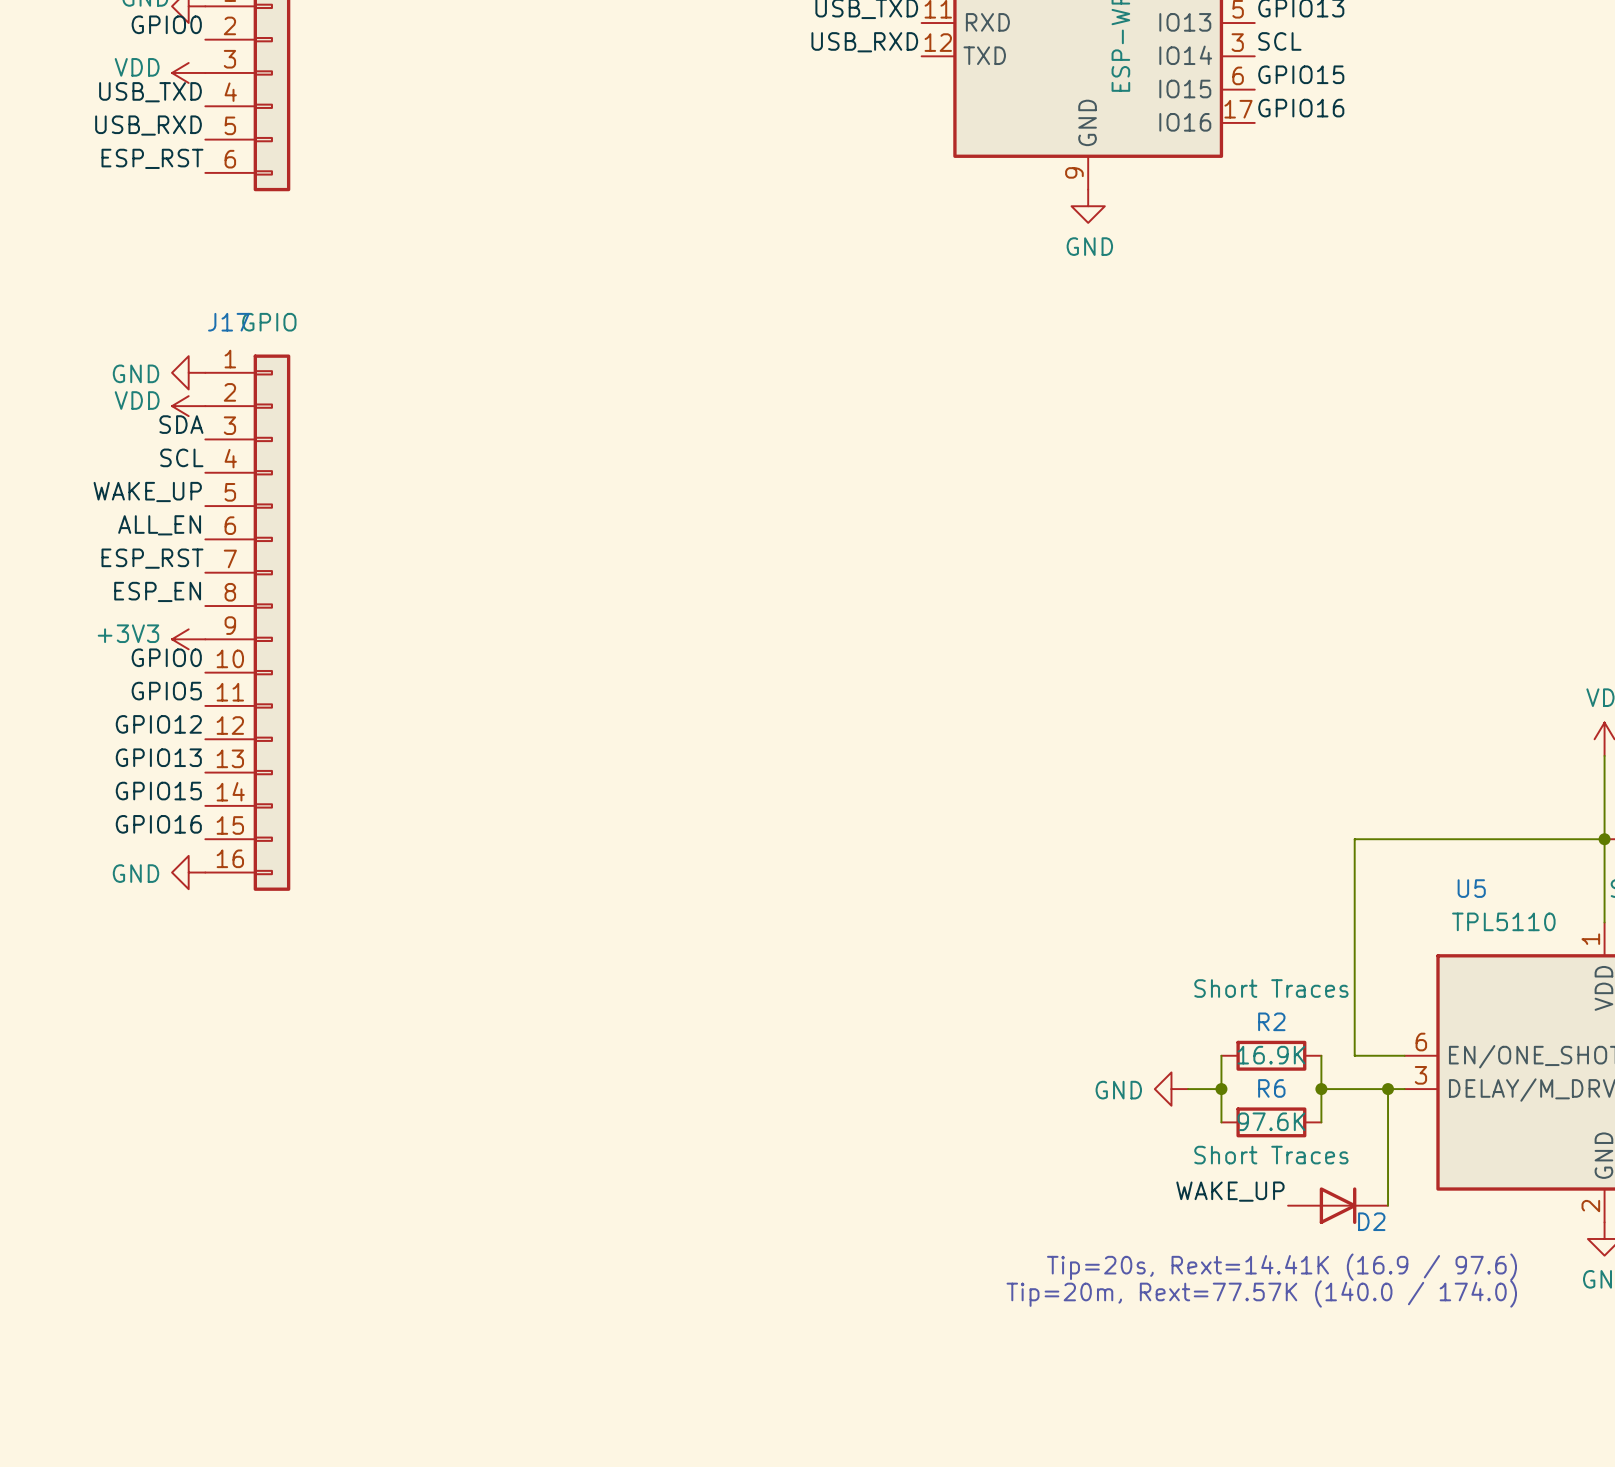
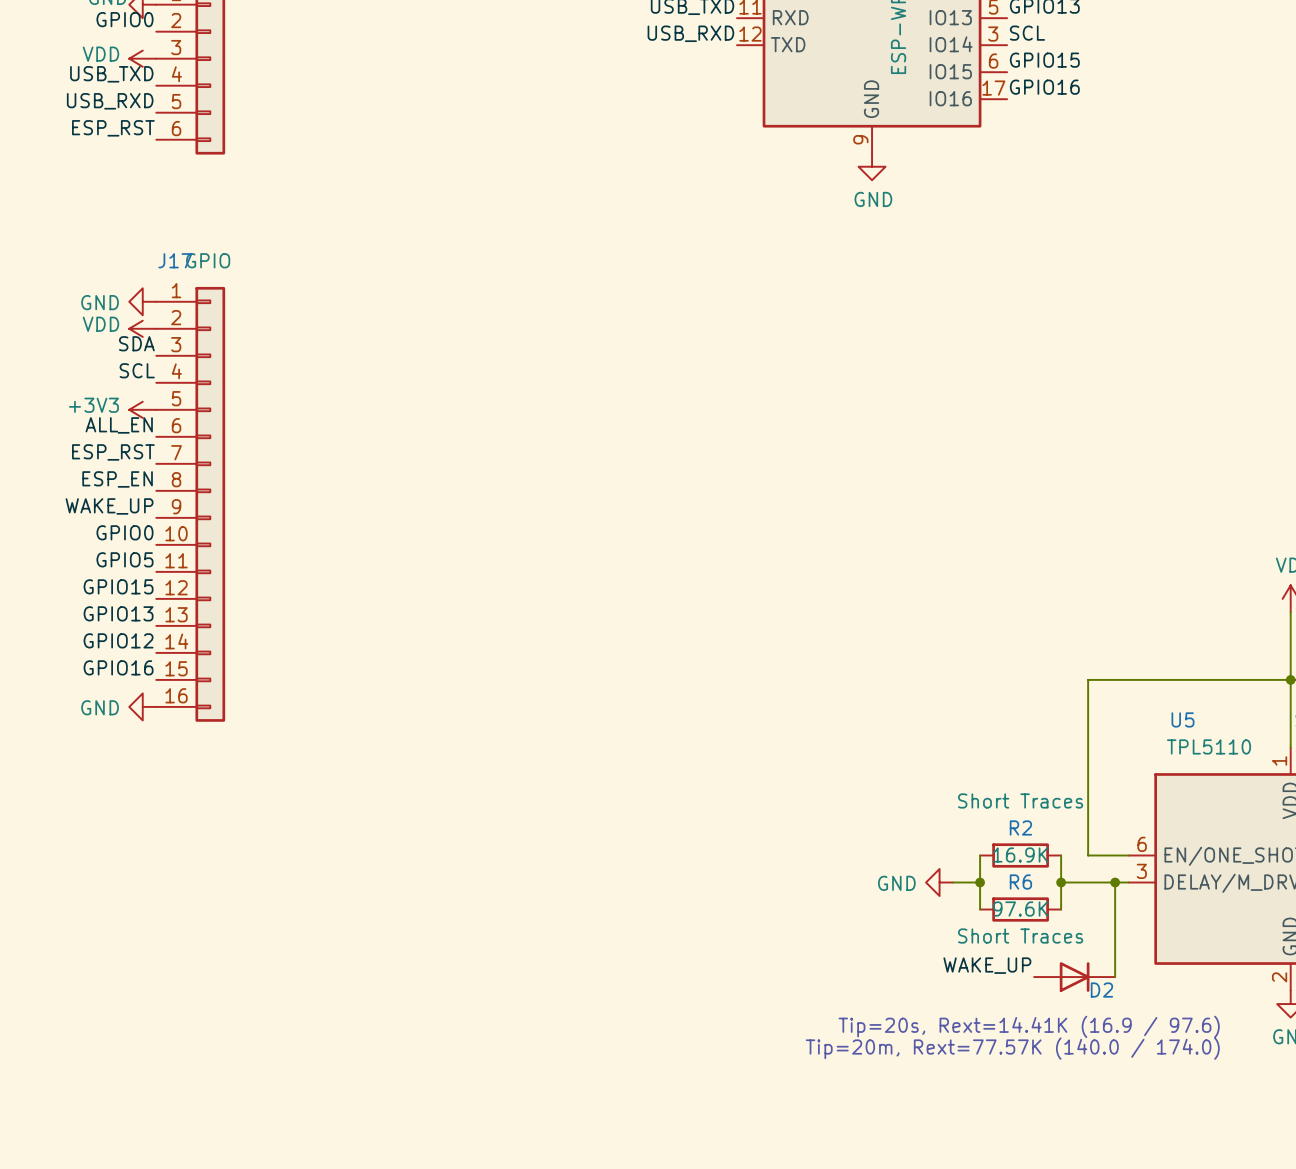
label position: WAKE_UP (147, 492) -> WAKE_UP (109, 506)
power symbol position: +3V3 (188, 639) -> +3V3 (142, 409)
label: GPIO12 (158, 724) -> GPIO15 (118, 586)
label: GPIO15 (158, 791) -> GPIO12 (118, 640)

